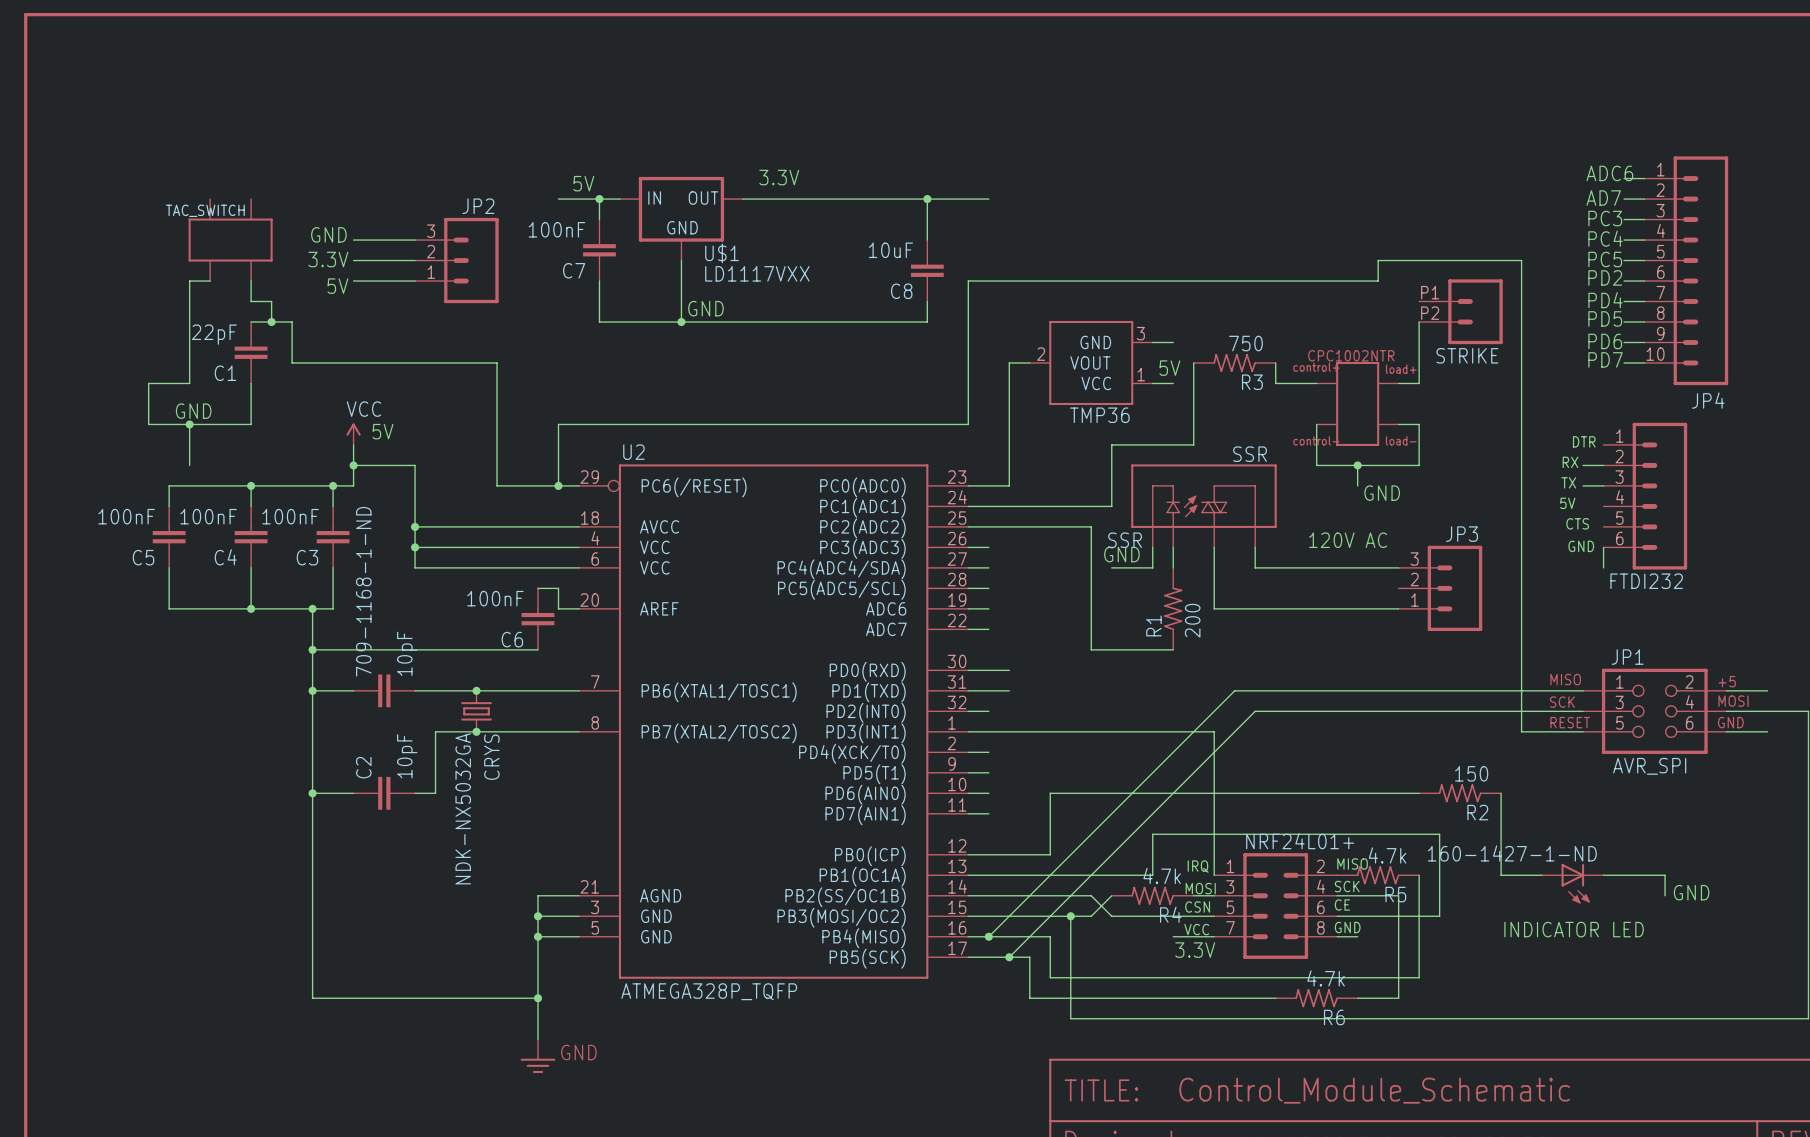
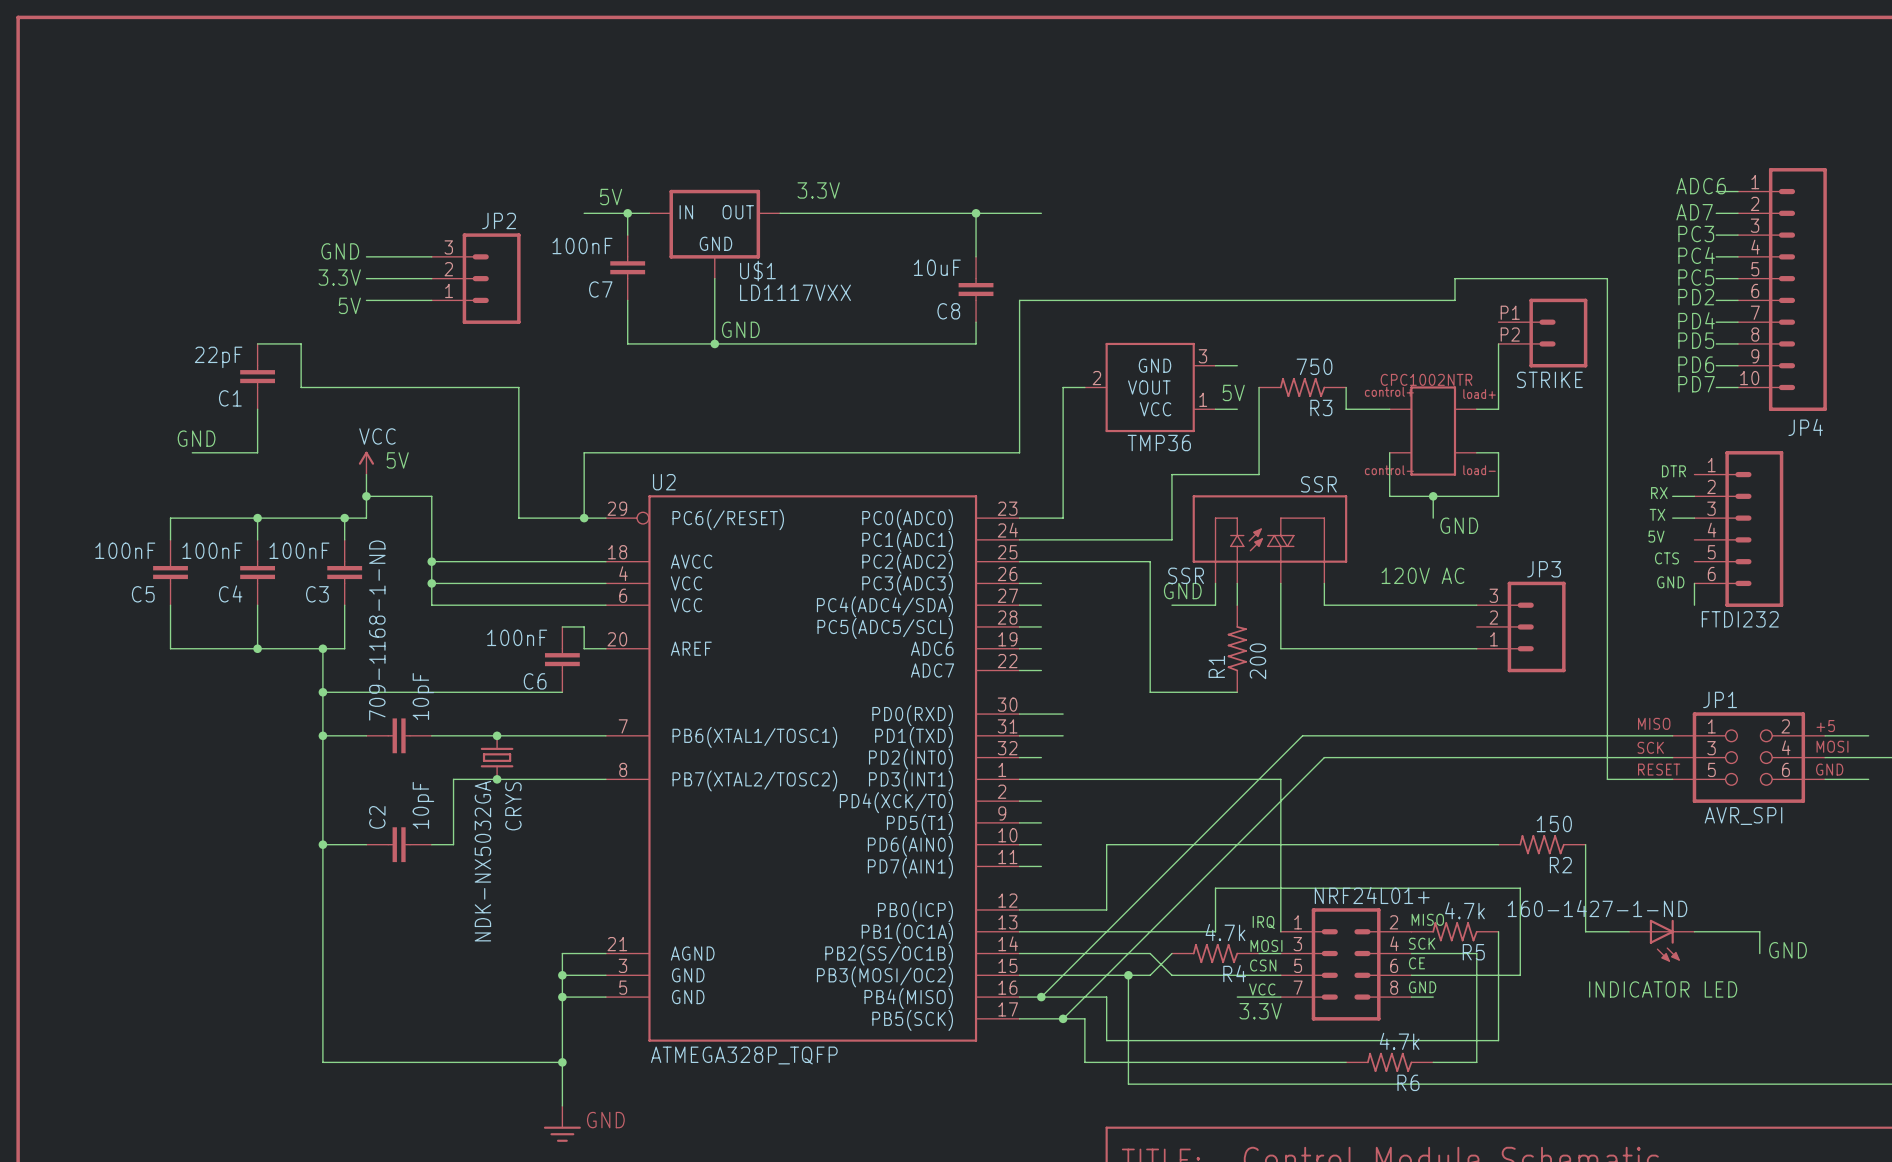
TAC_SWITCH: (230, 240) -> none
wire: (210, 281) (189, 281) (189, 383) (148, 383) (148, 424) (189, 424) (189, 465) -> none
wire: (251, 281) (251, 301) (271, 301) (271, 322) -> none
junction: (271, 322) -> none
junction: (189, 424) -> none

